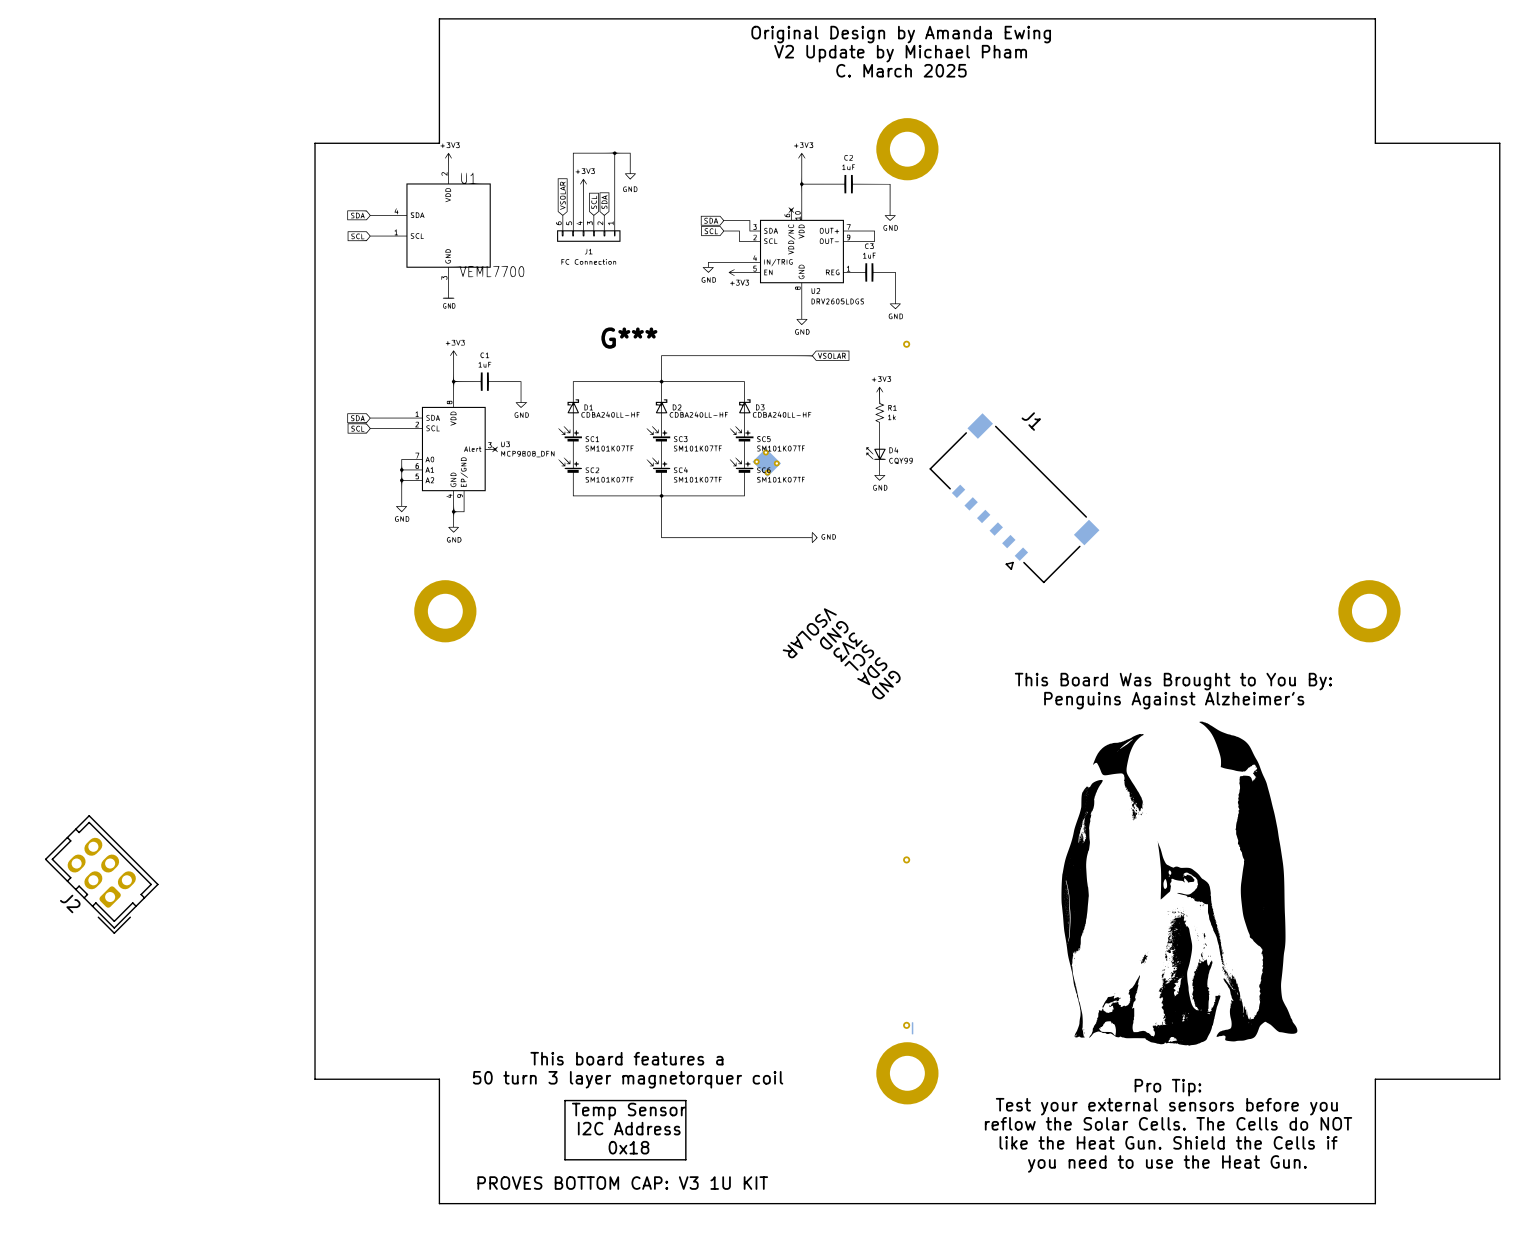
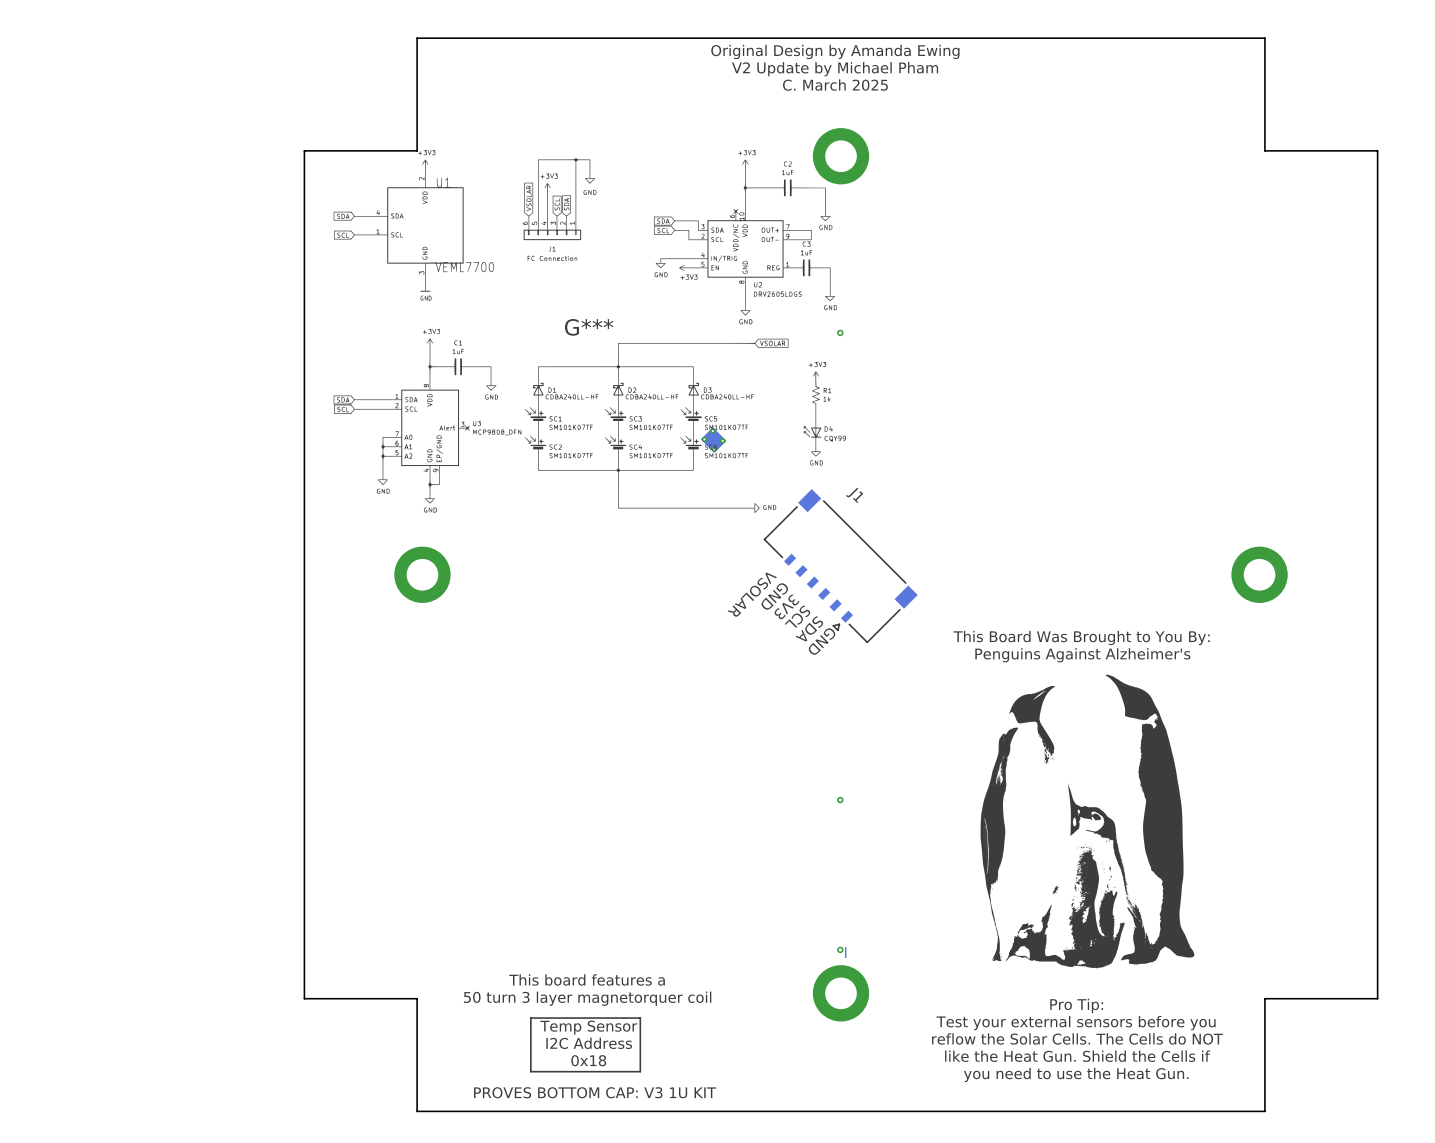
J1 position: (1014, 498) -> (840, 566)
J2: (101, 874) -> none

